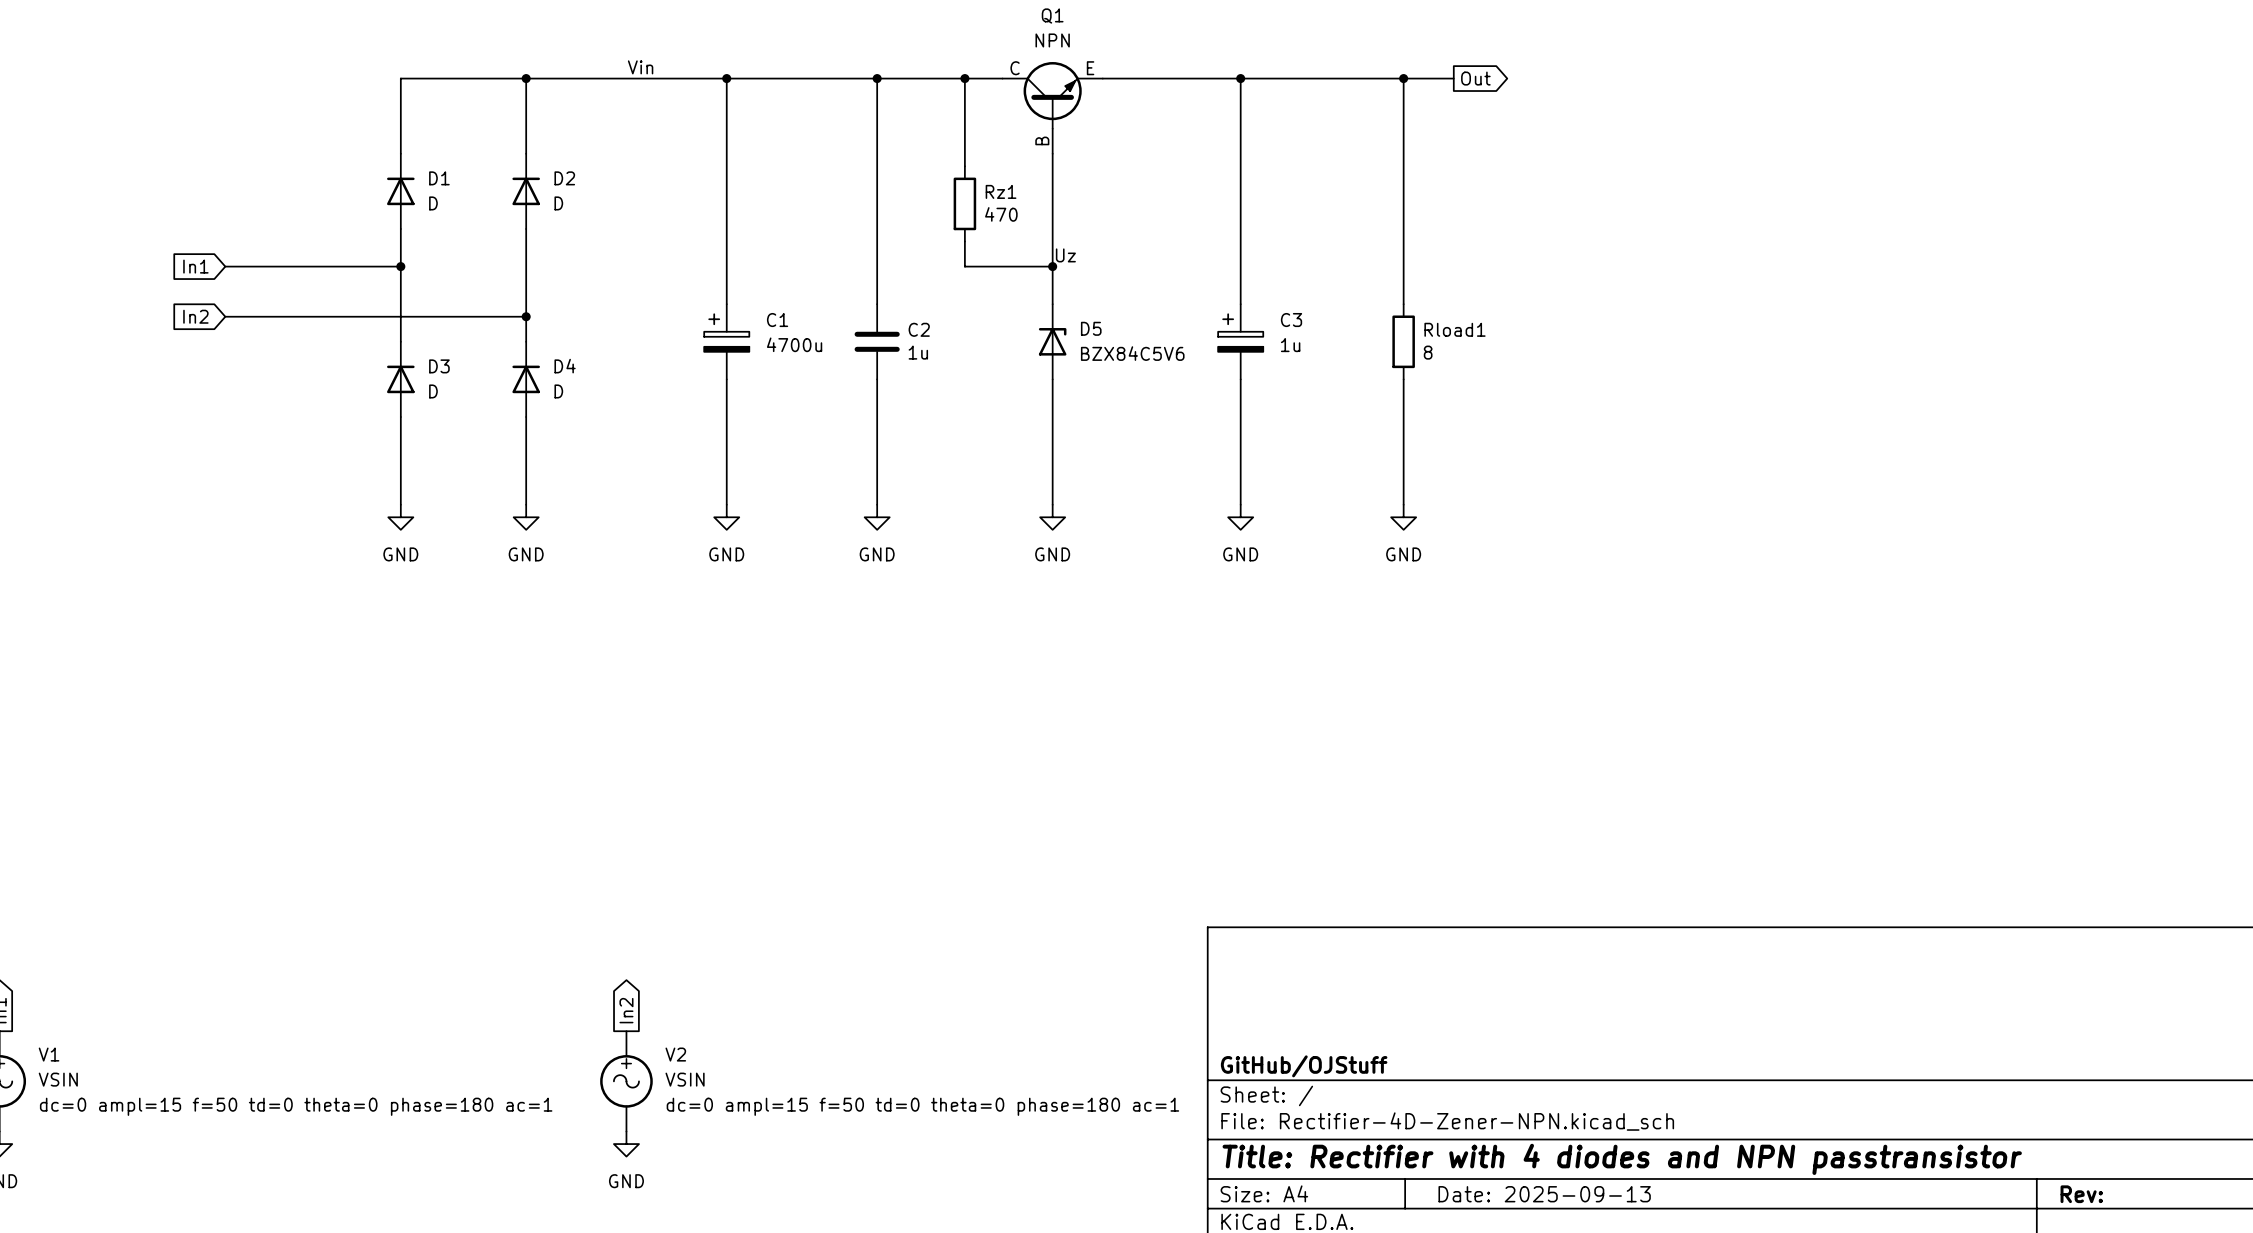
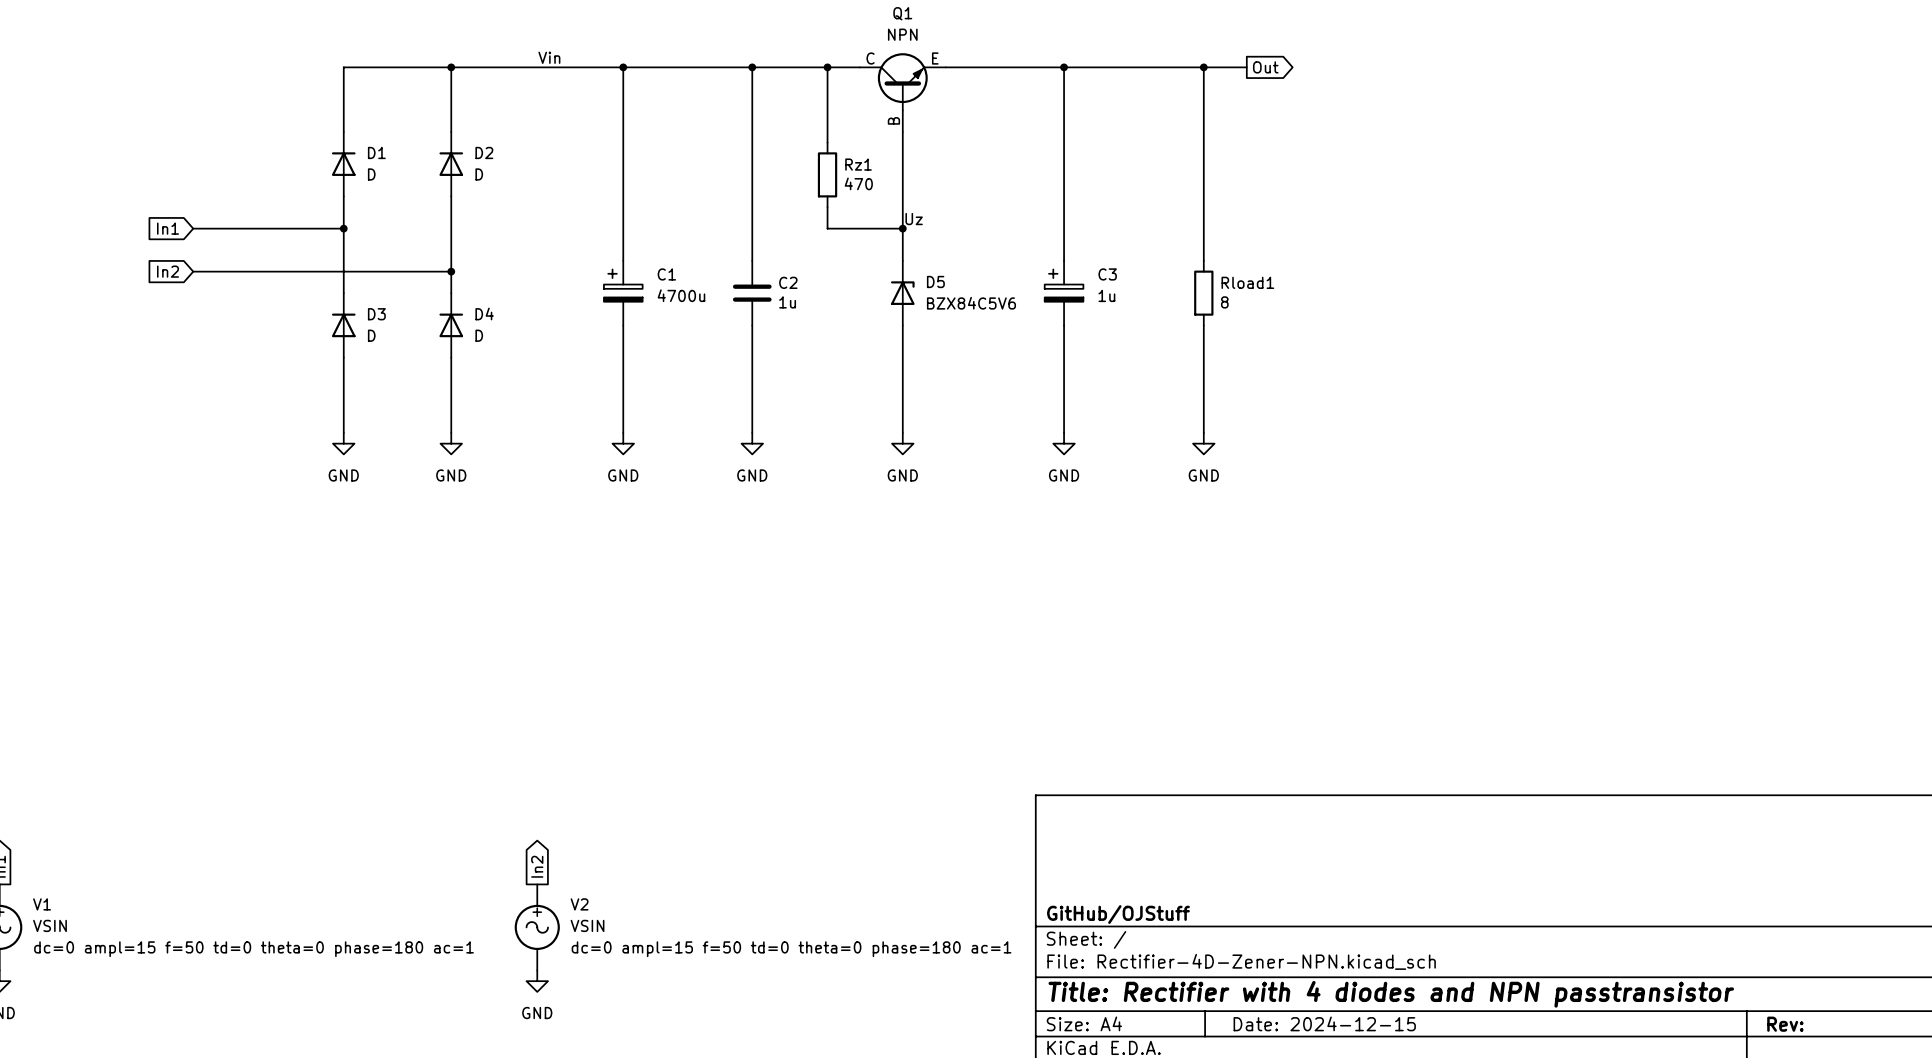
title block: Date: 2025-09-13 (1544, 1194) -> Date: 2024-12-15 (1324, 1023)

